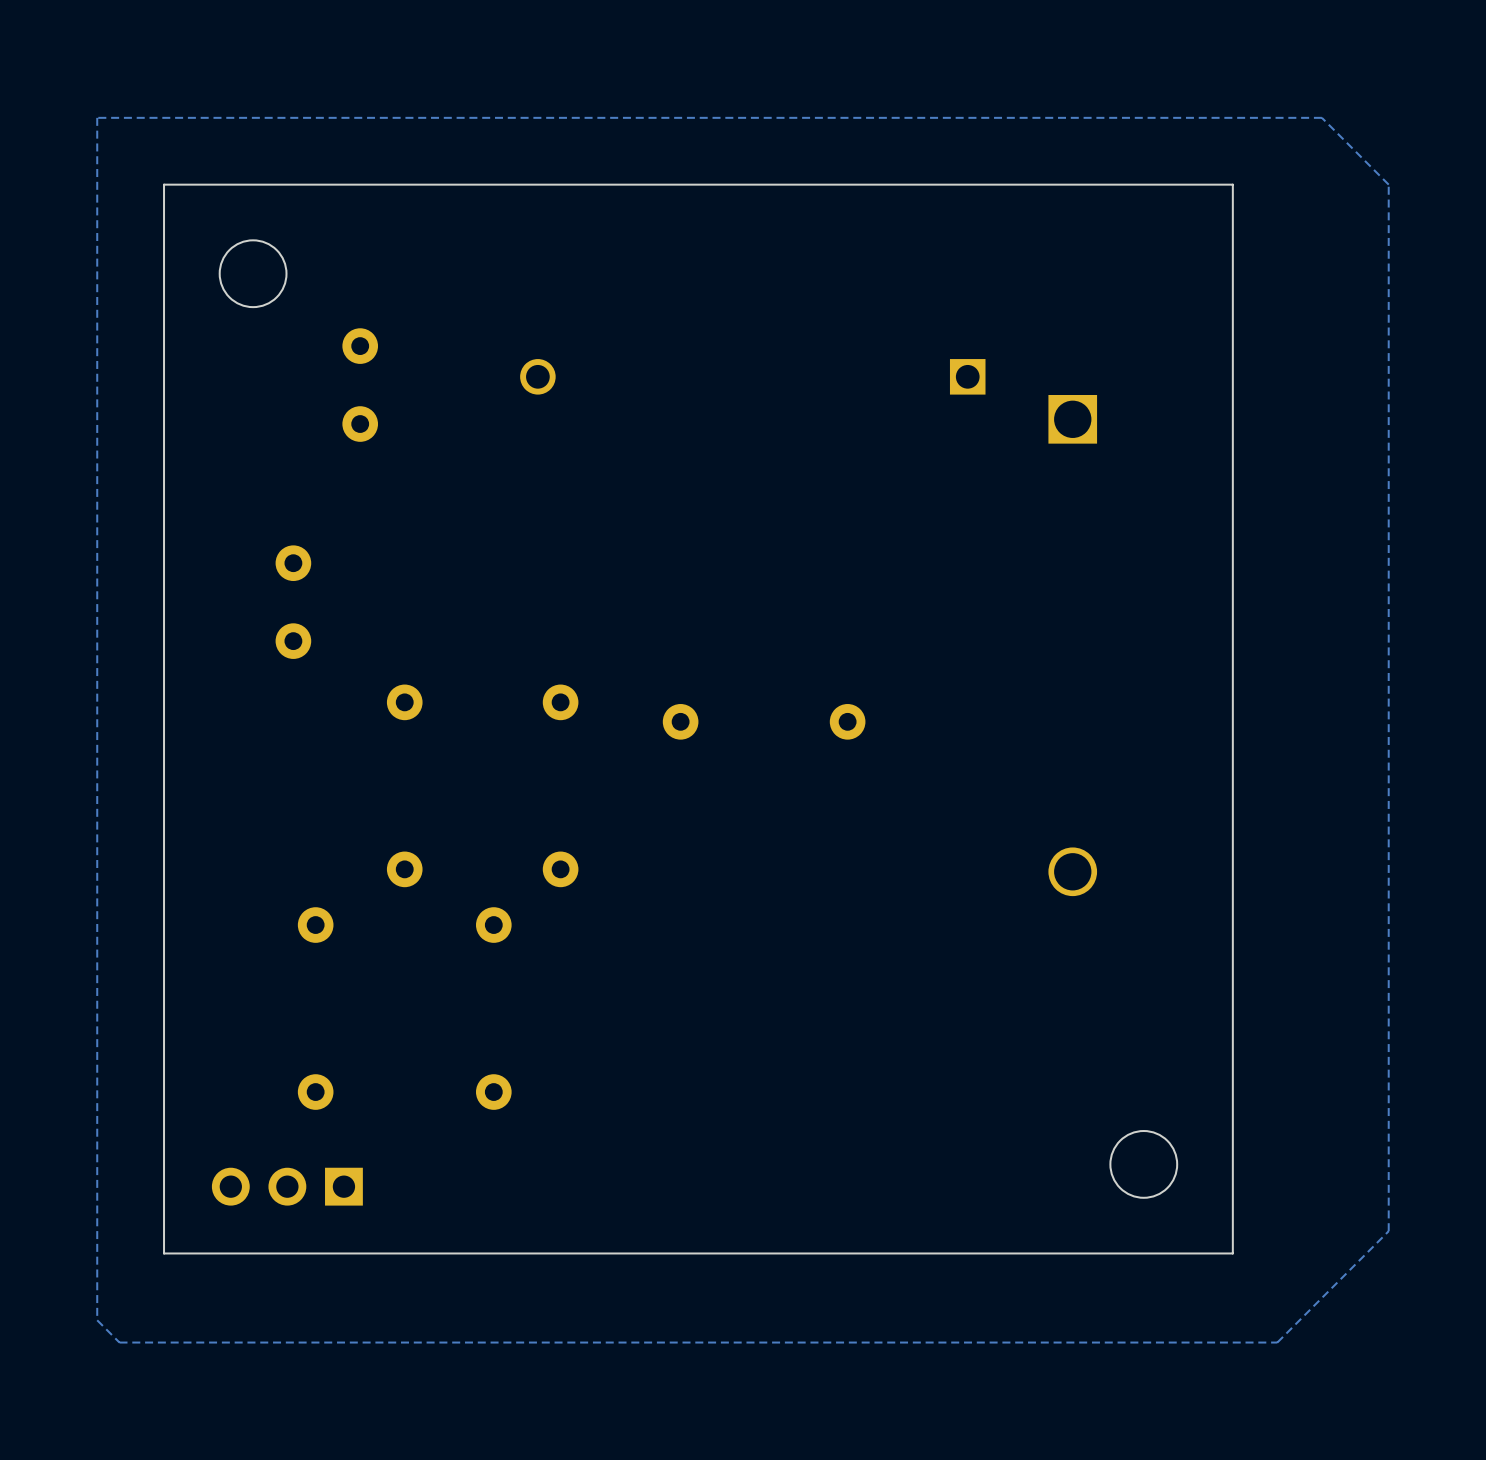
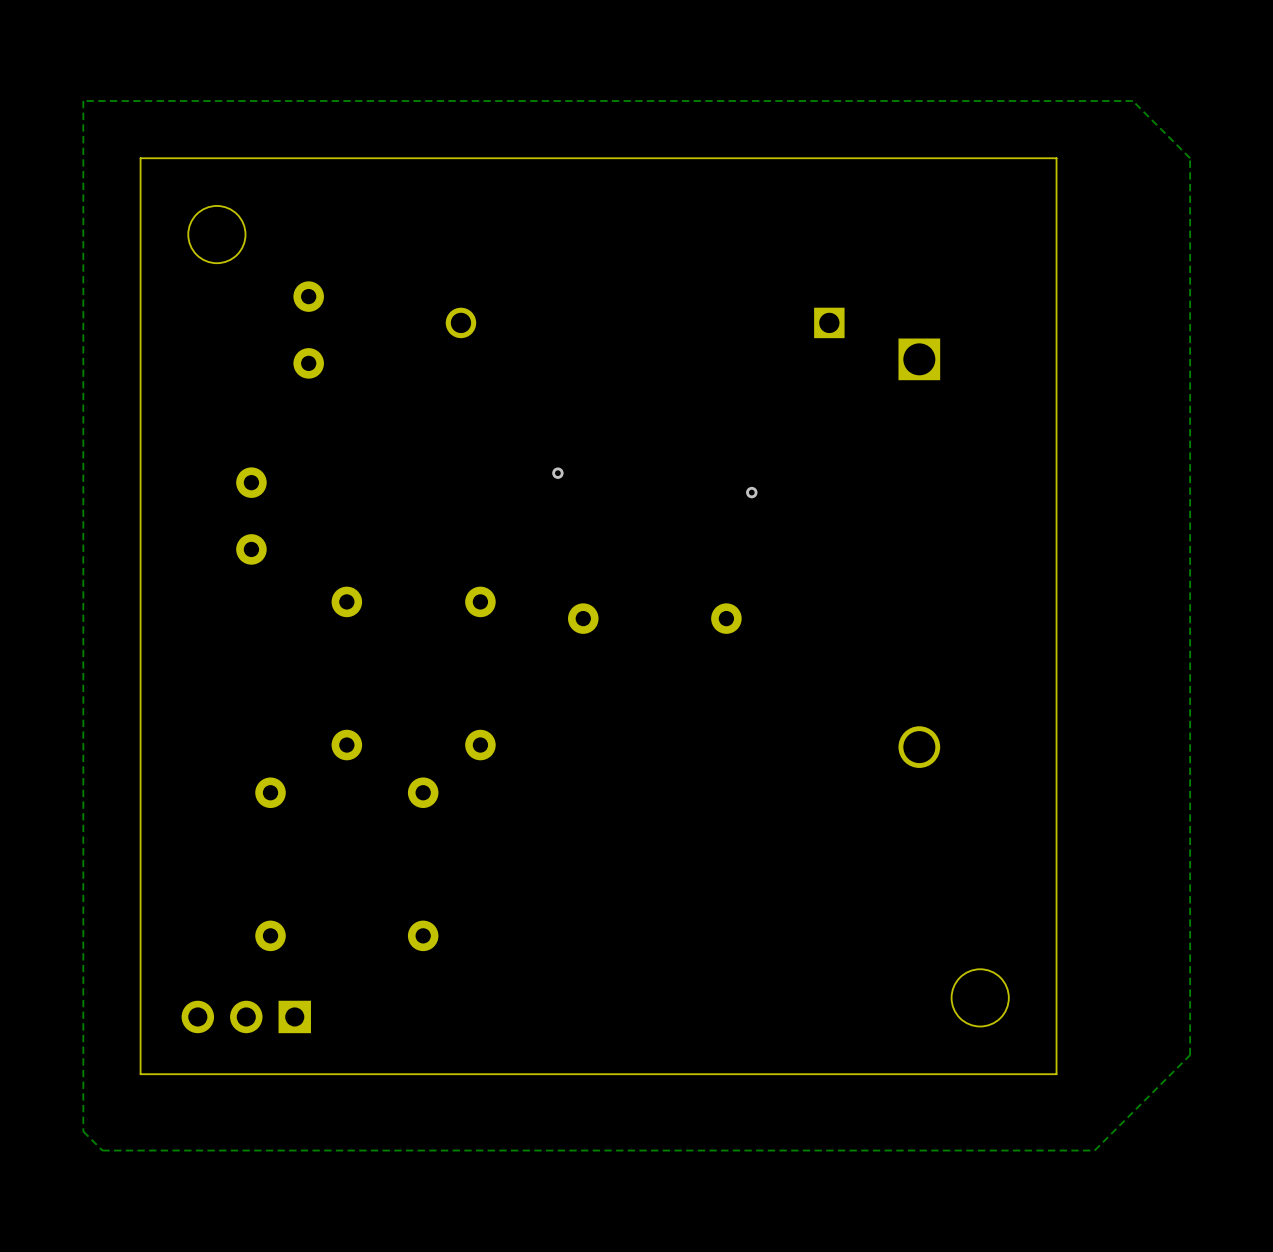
via: none -> (557, 473)
via: none -> (751, 492)

